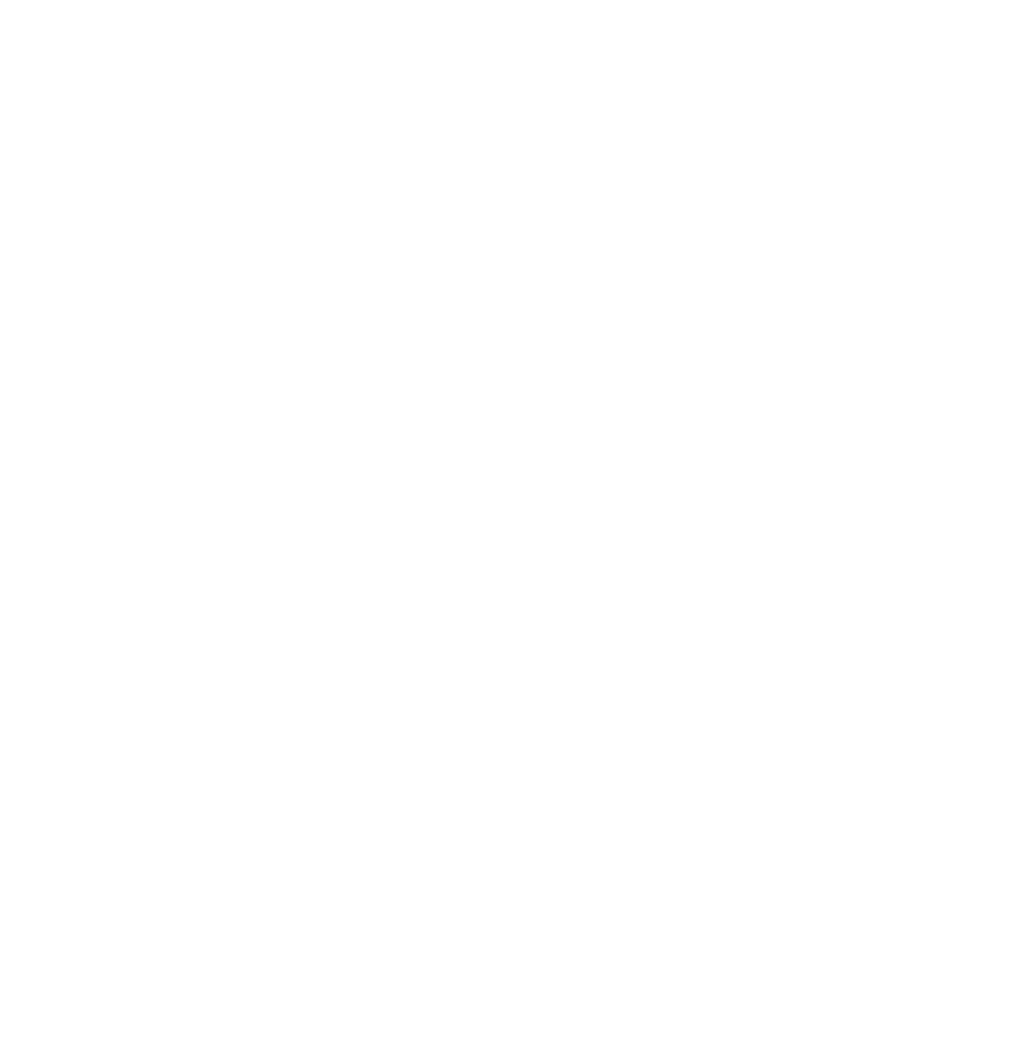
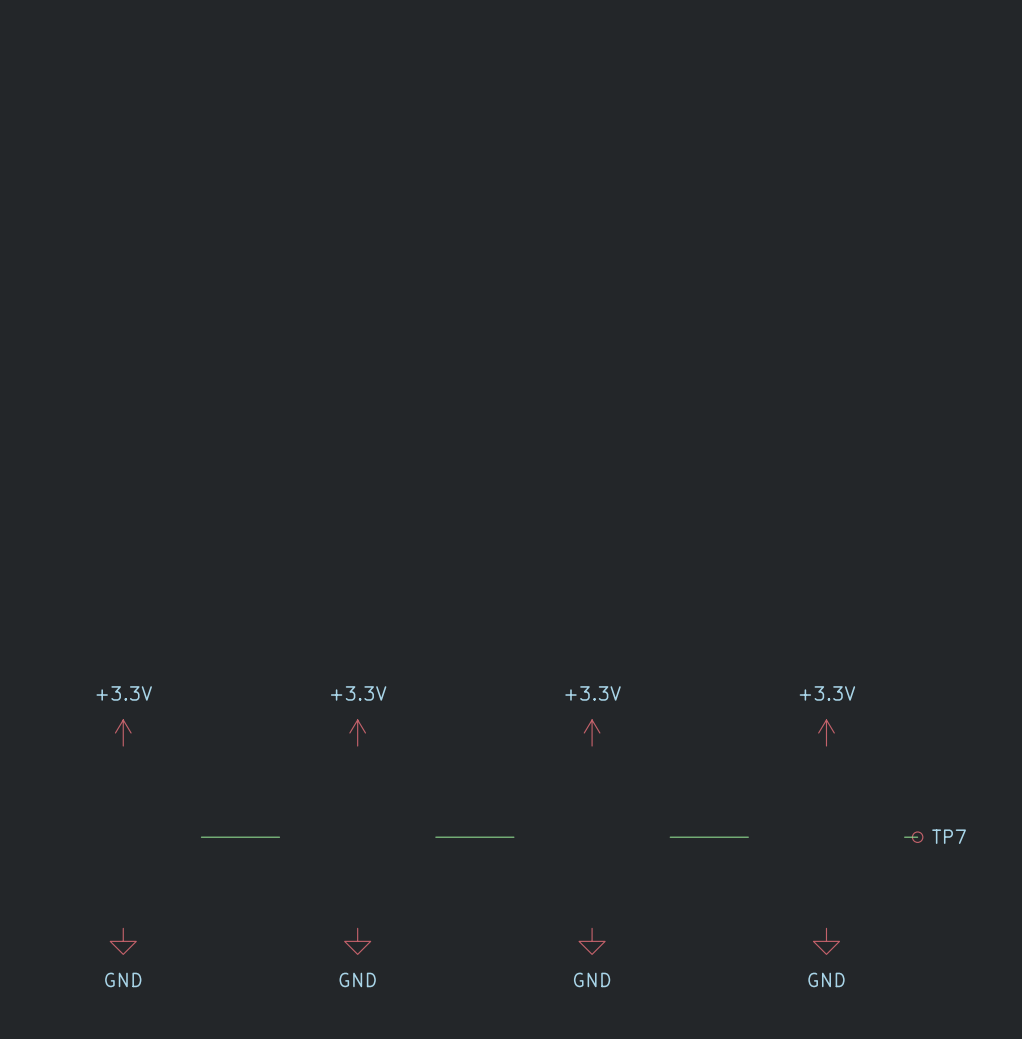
power symbol: none -> +3.3V (123, 733)
power symbol: none -> +3.3V (357, 733)
power symbol: none -> +3.3V (592, 733)
power symbol: none -> +3.3V (826, 733)
wire: none -> (201, 837) (279, 837)
wire: none -> (435, 837) (513, 837)
wire: none -> (670, 837) (748, 837)
wire: none -> (904, 837) (917, 837)
TP7: none -> (917, 837)
power symbol: none -> GND (123, 941)
power symbol: none -> GND (357, 941)
power symbol: none -> GND (592, 941)
power symbol: none -> GND (826, 941)

